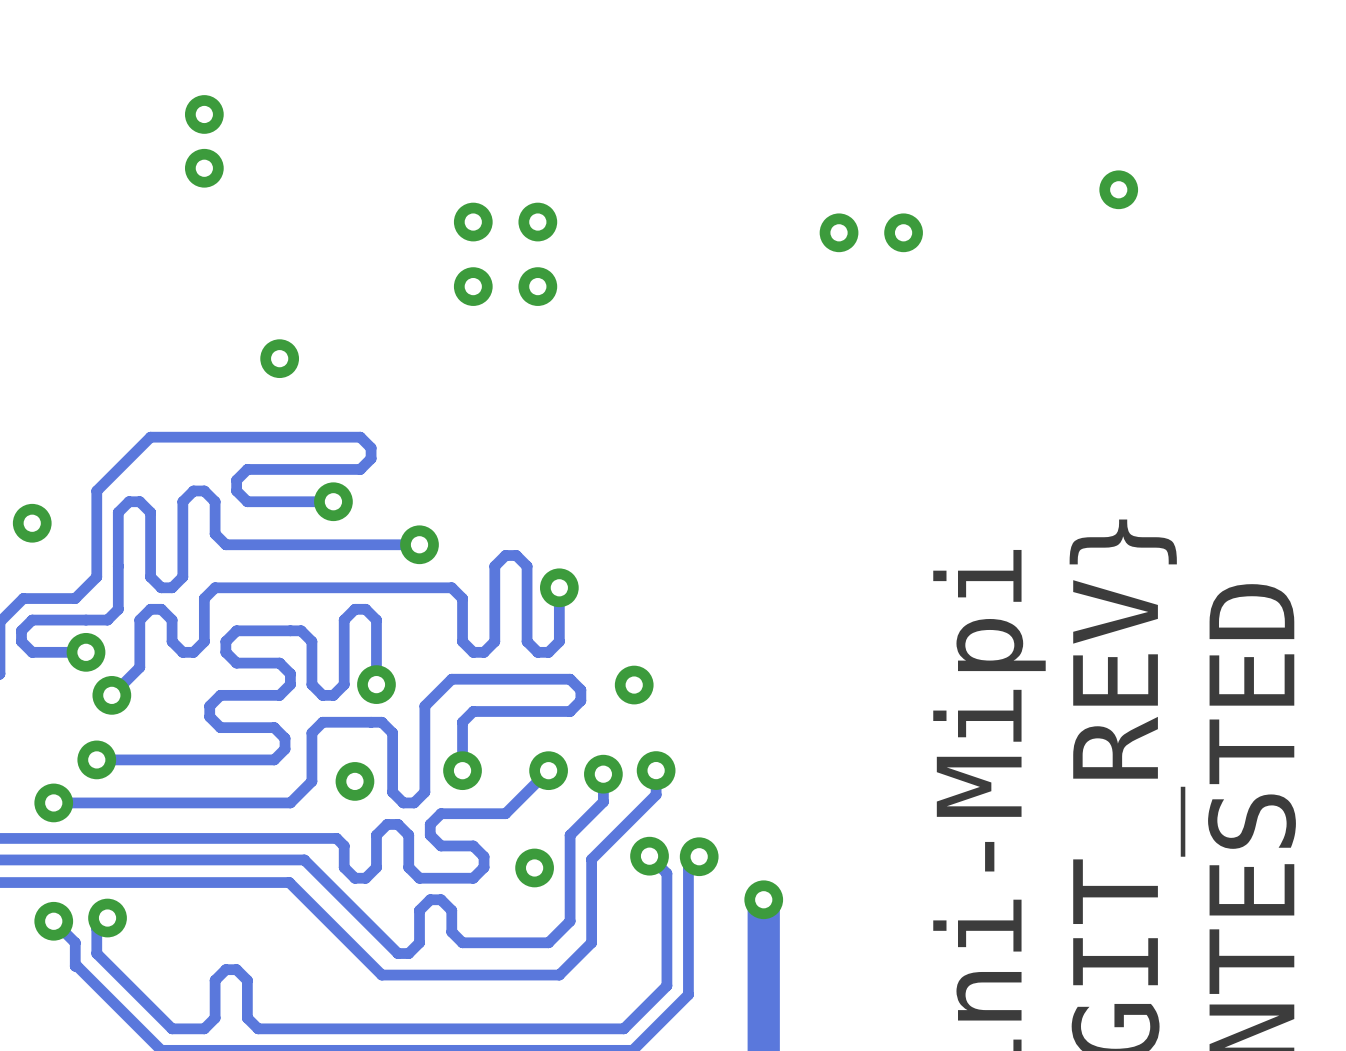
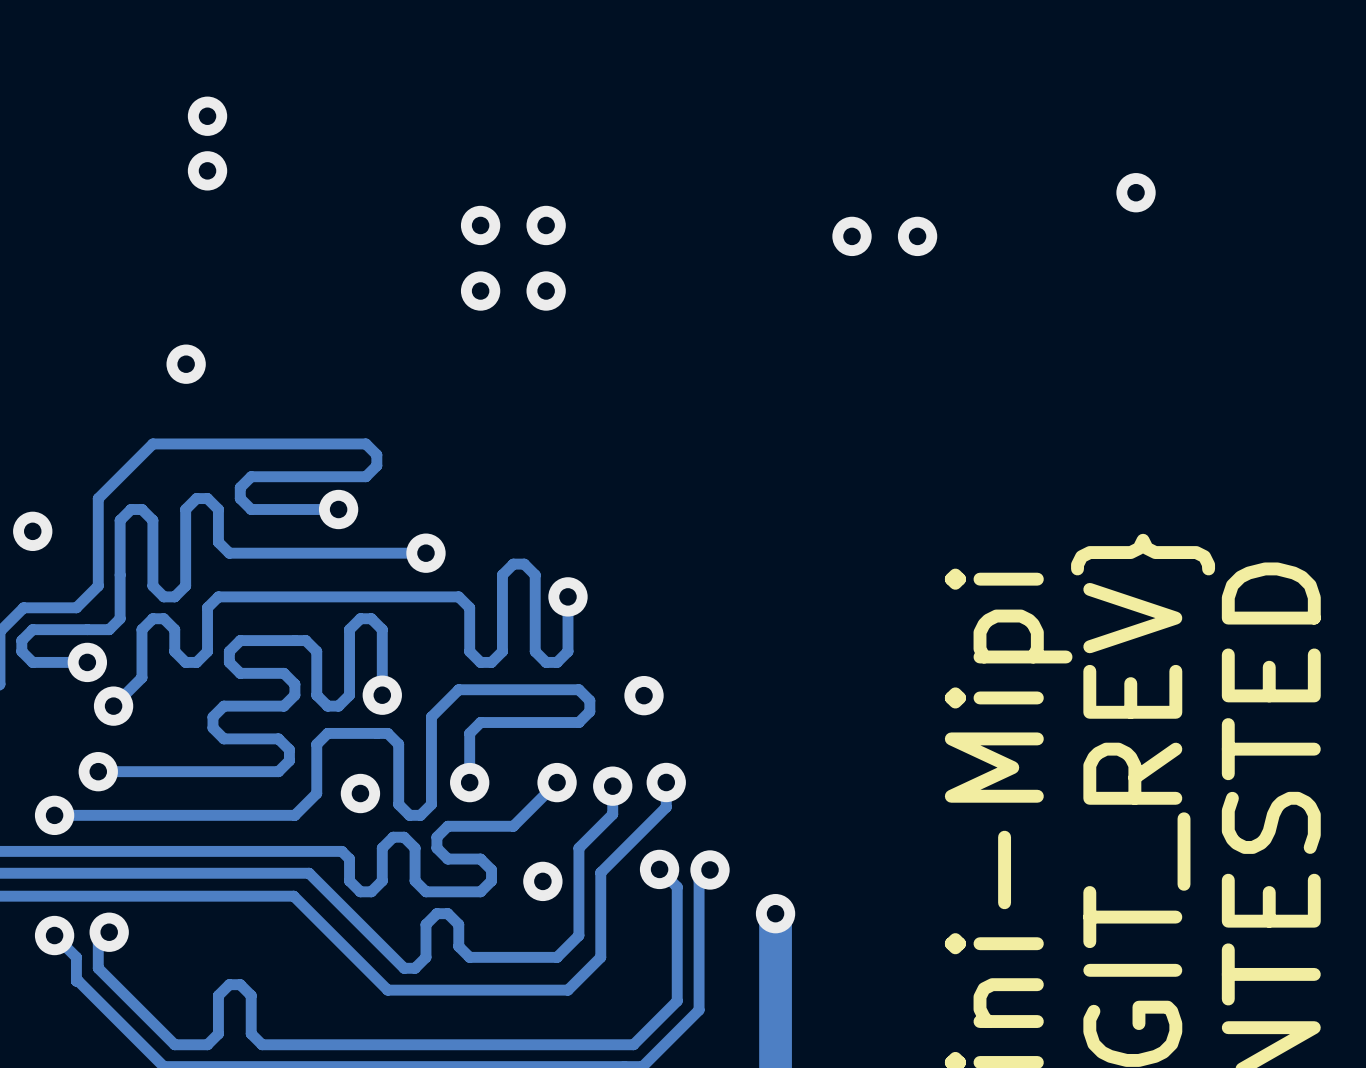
via position: (279, 358) -> (186, 364)

